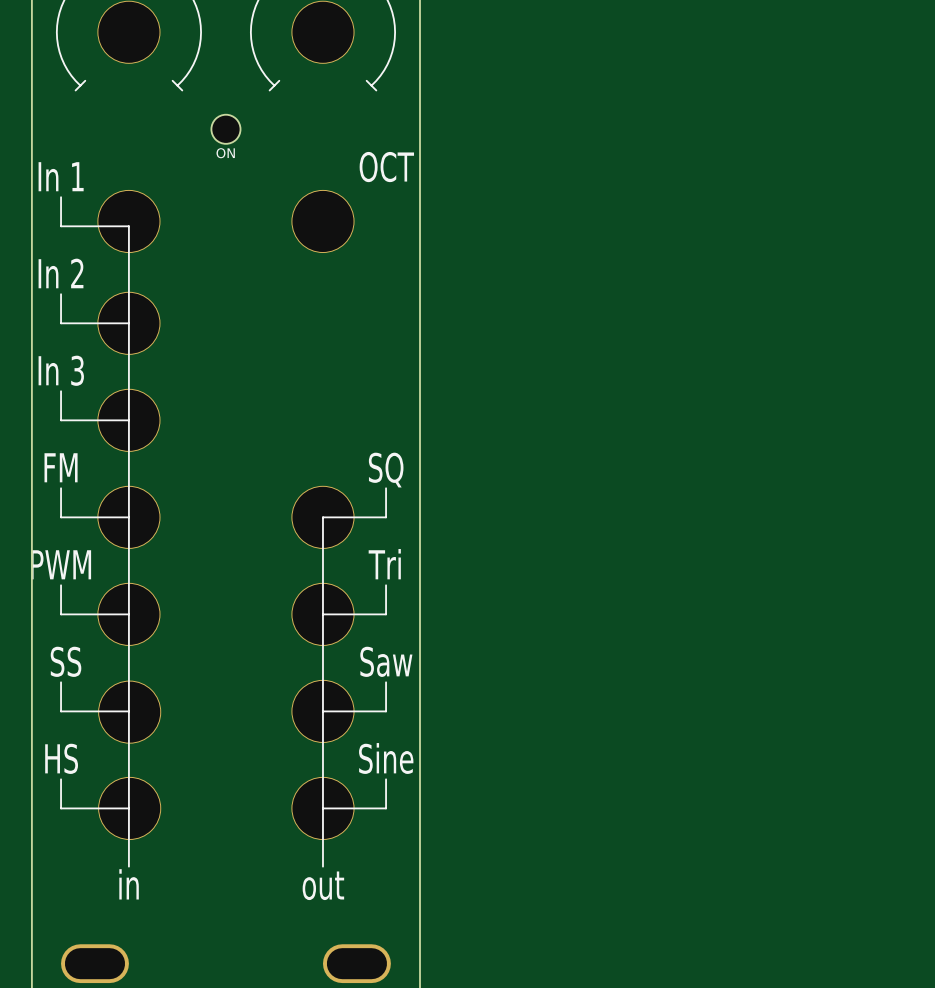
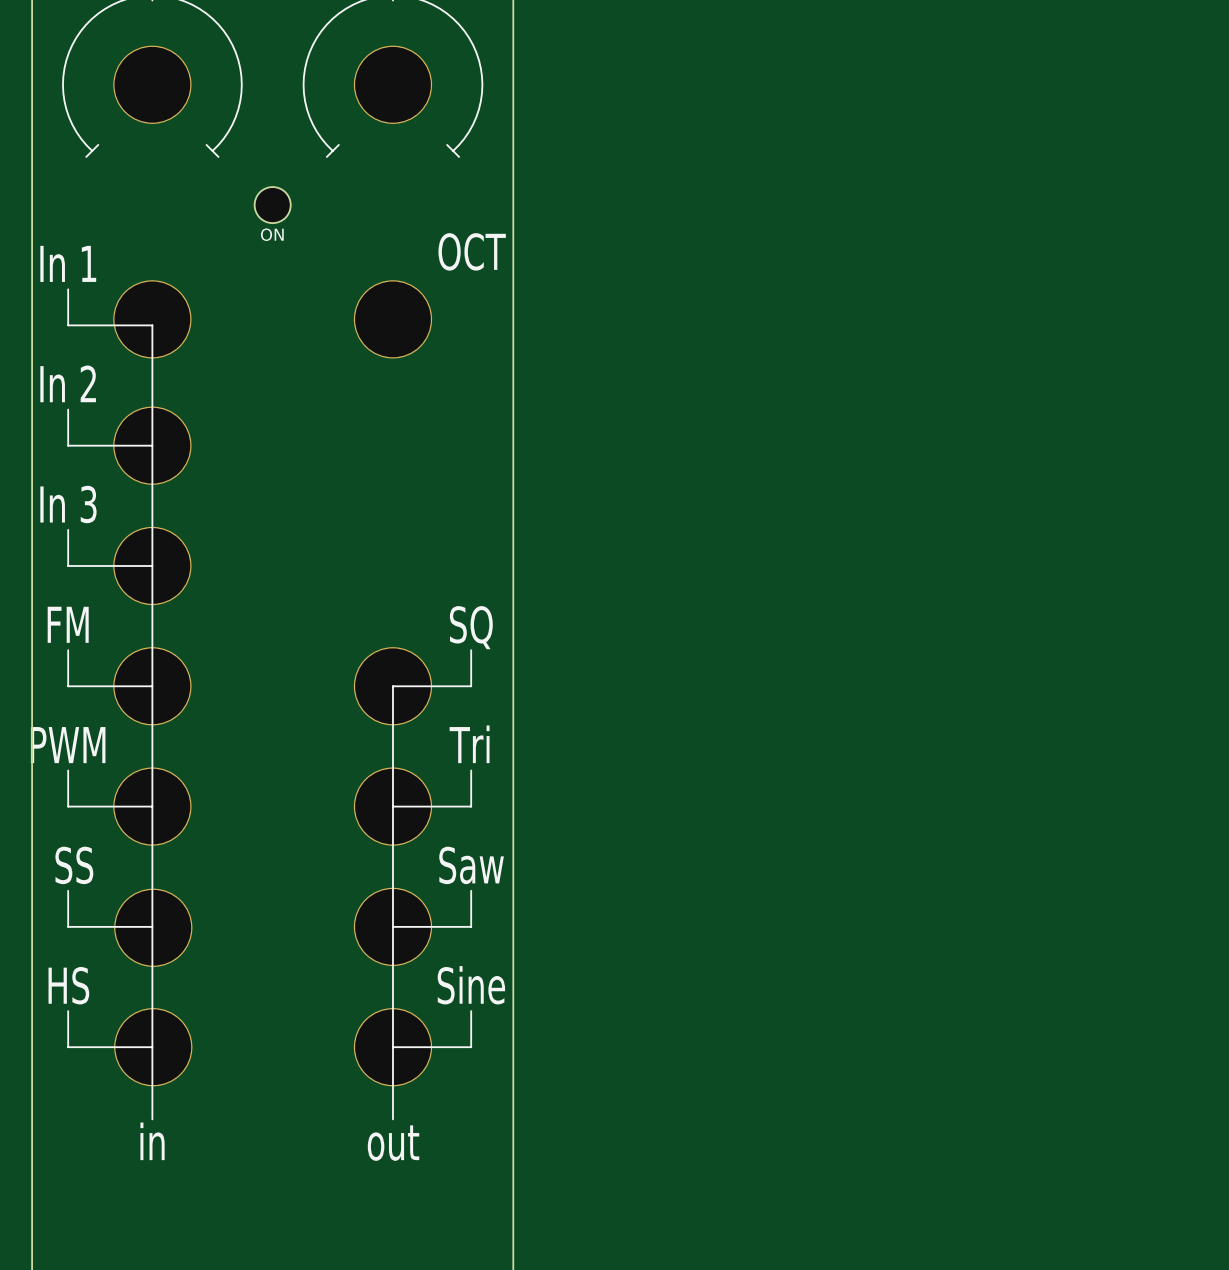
part: (94, 963) -> none
part: (356, 963) -> none

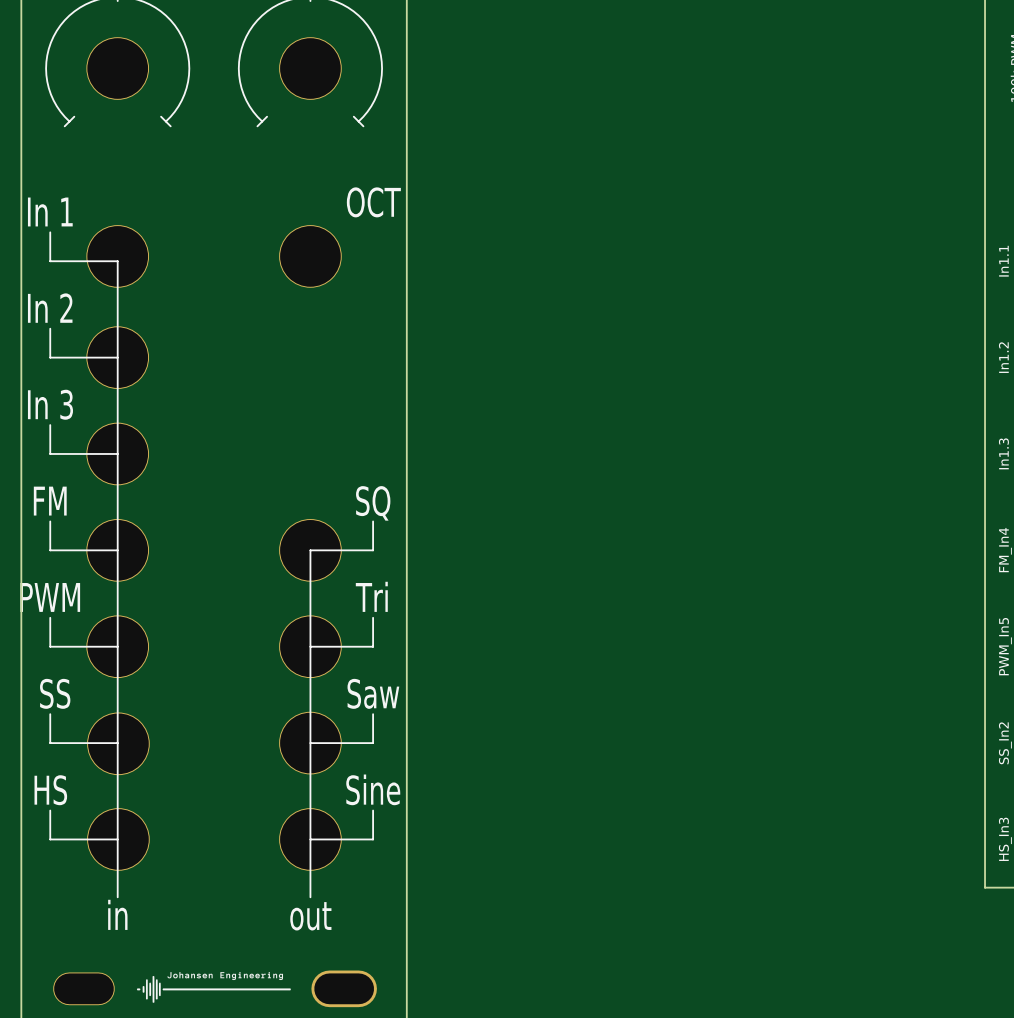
part: ON (272, 205) -> none
drawing: none -> [136, 972, 291, 1003]
part: none -> (83, 988)
part: none -> (344, 988)

